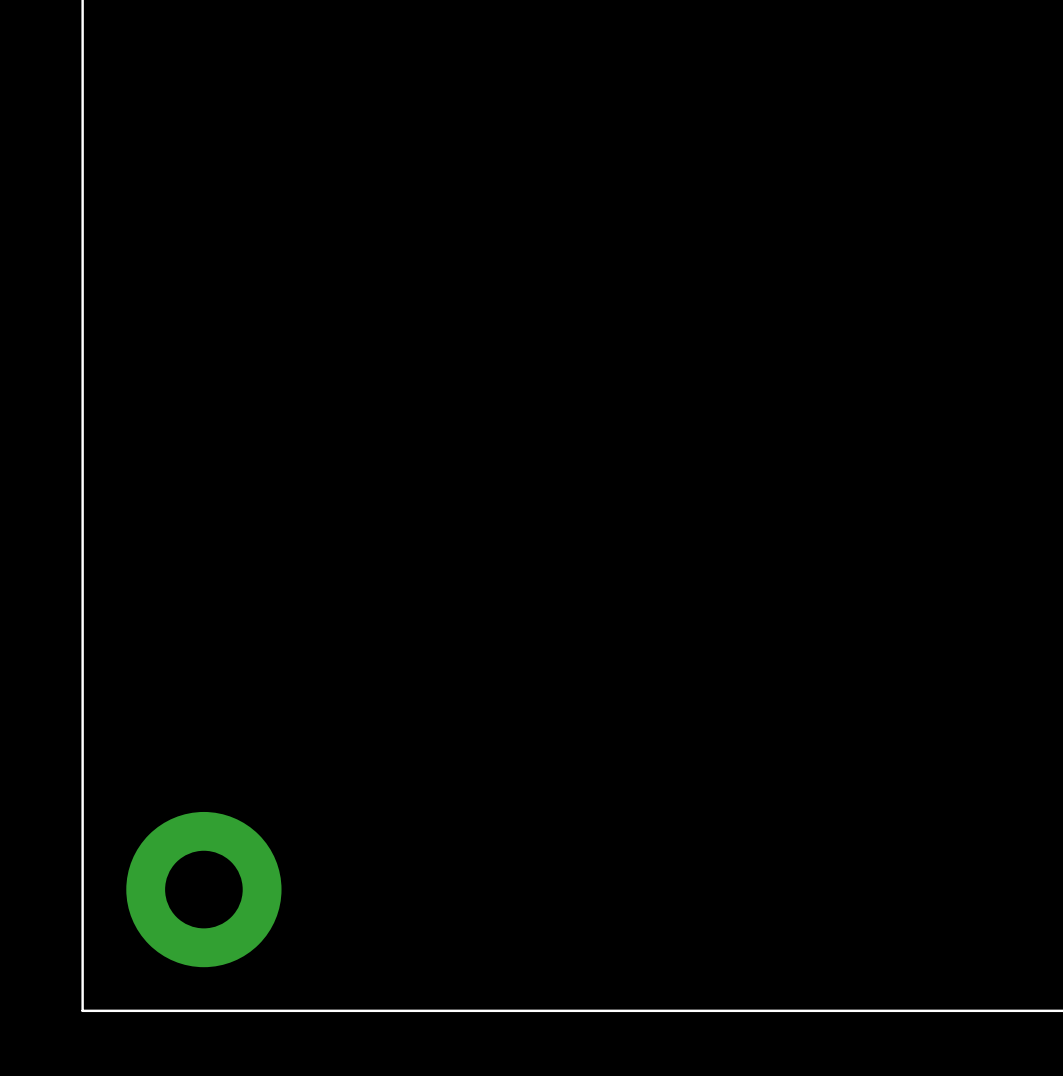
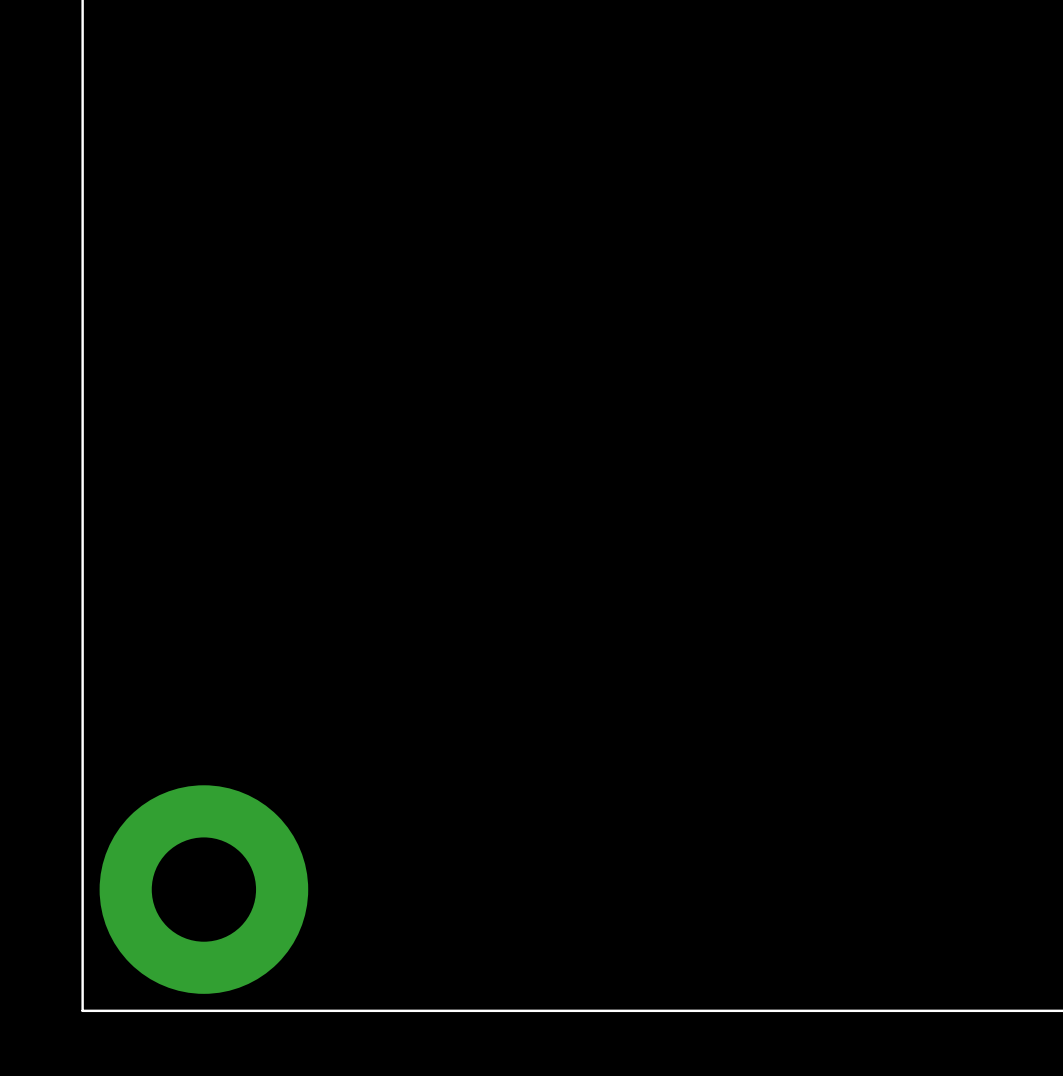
part footprint: [126, 811, 282, 968] -> [99, 785, 309, 994]

